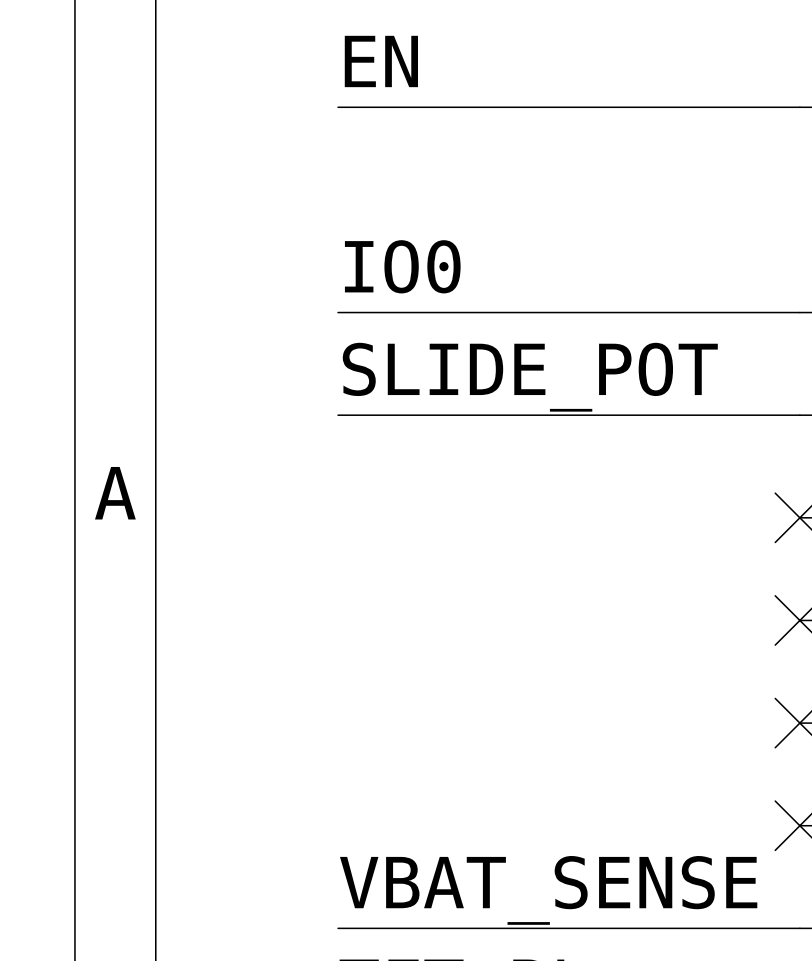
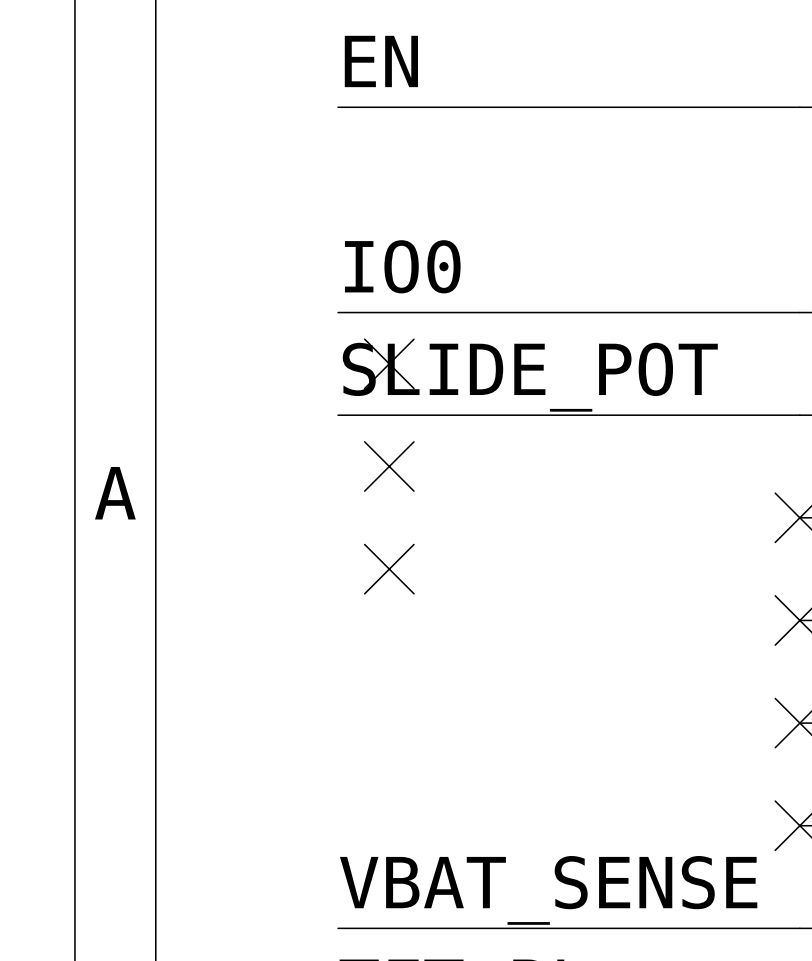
no-connect mark: none -> (389, 363)
no-connect mark: none -> (389, 466)
no-connect mark: none -> (389, 569)

